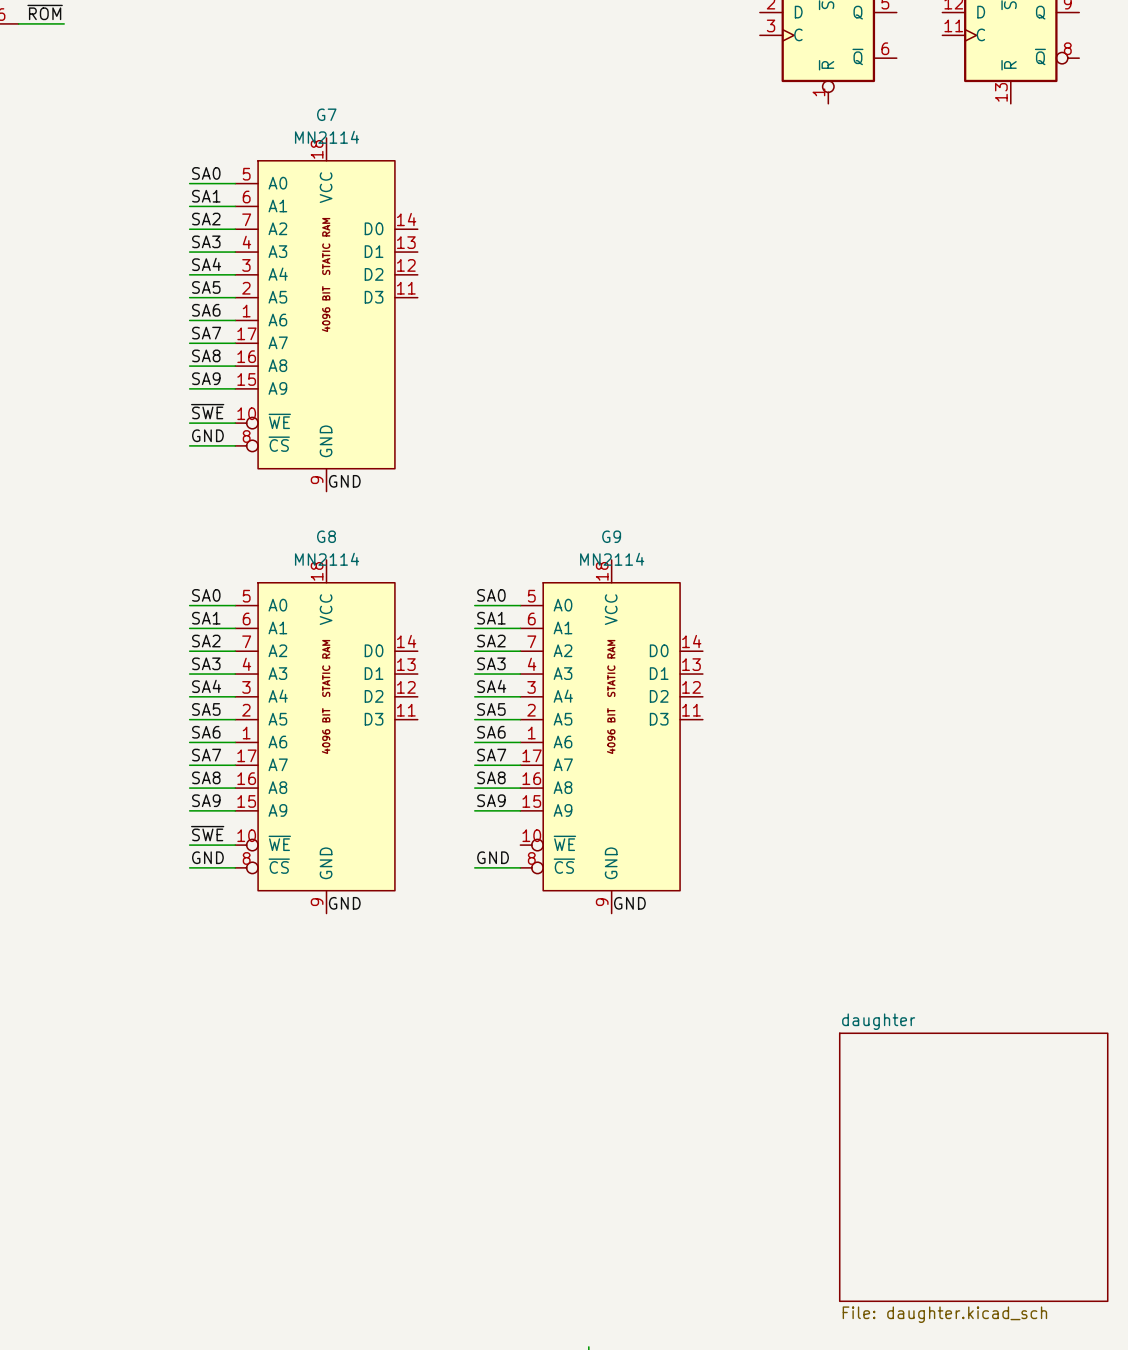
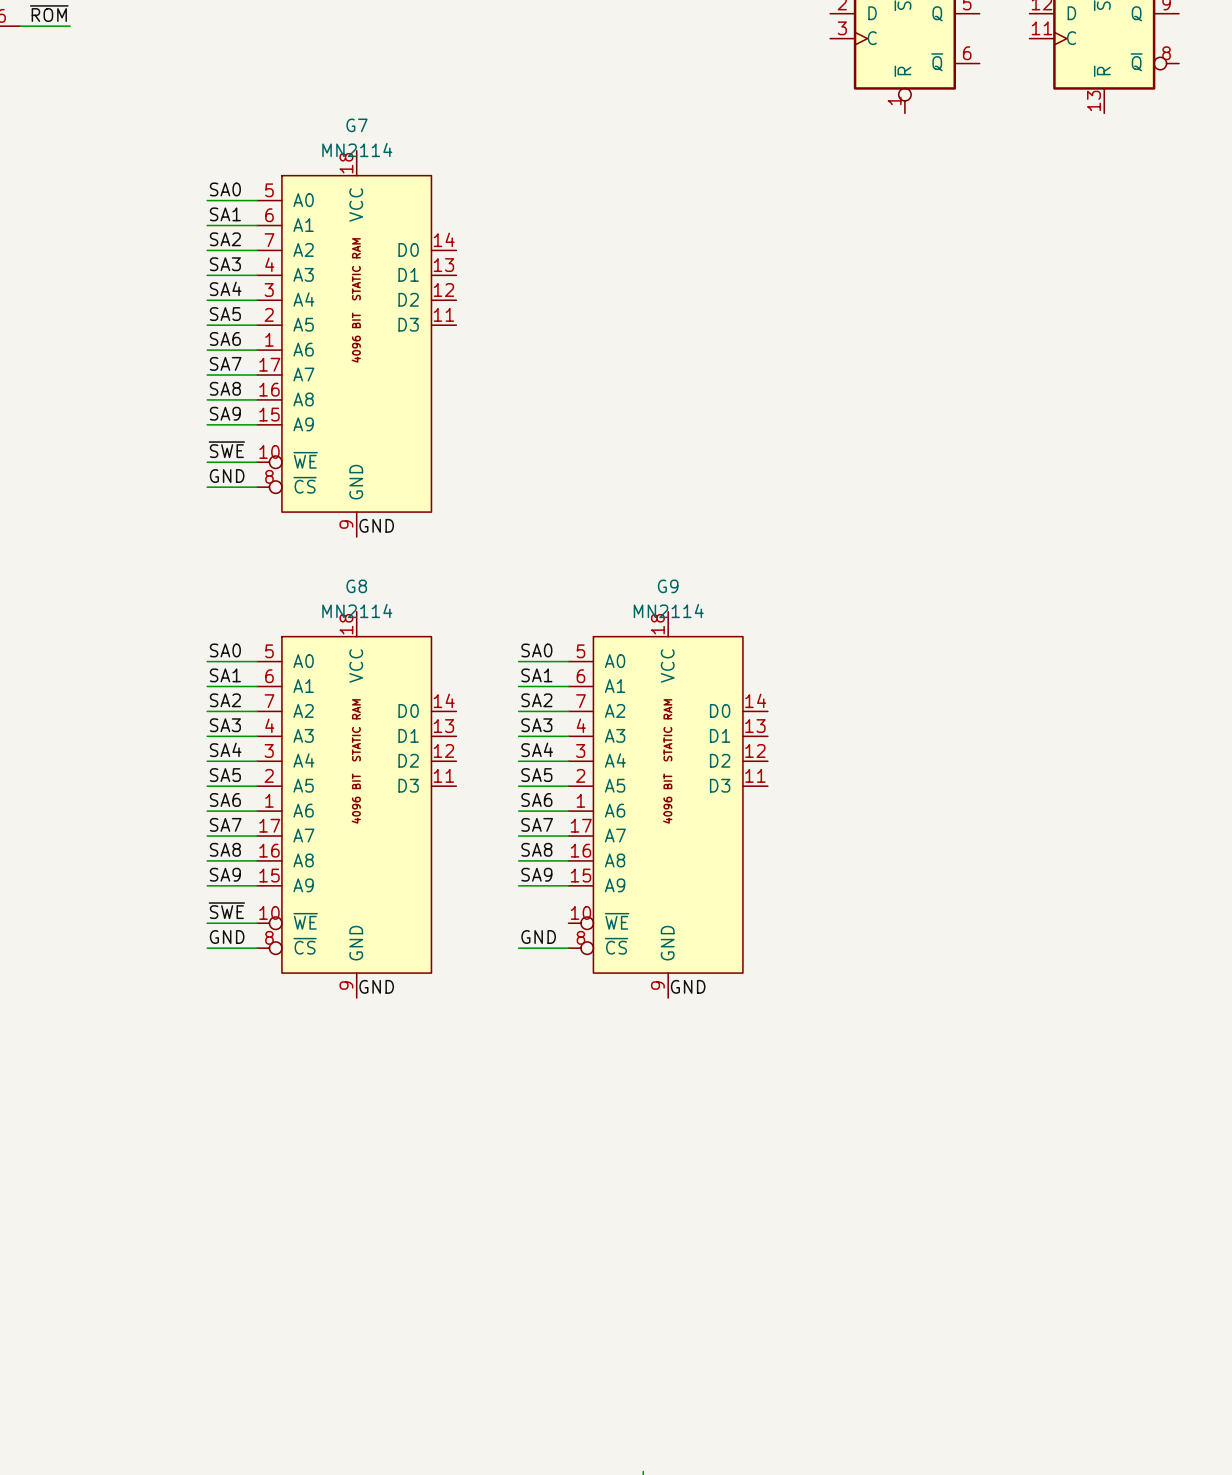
sheet daughter: File: daughter.kicad_sch (973, 1167) -> none

